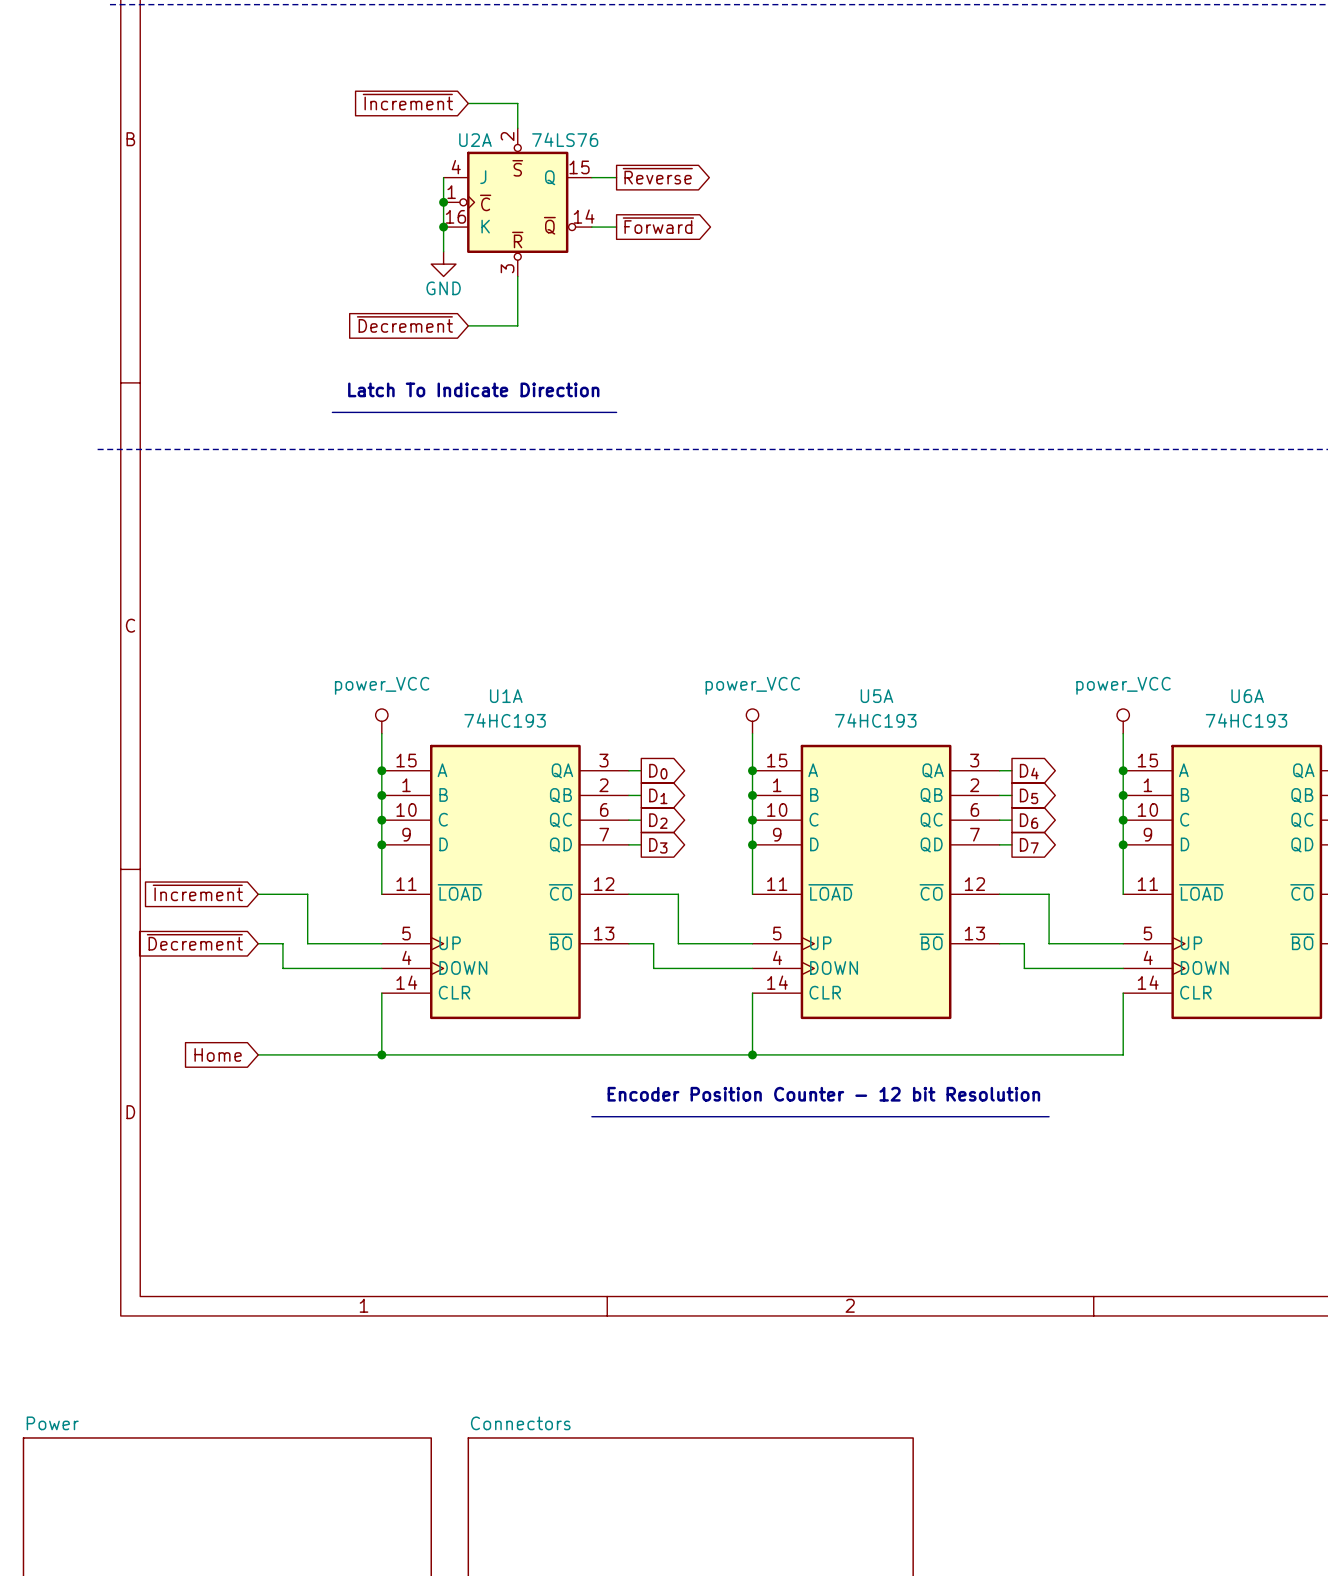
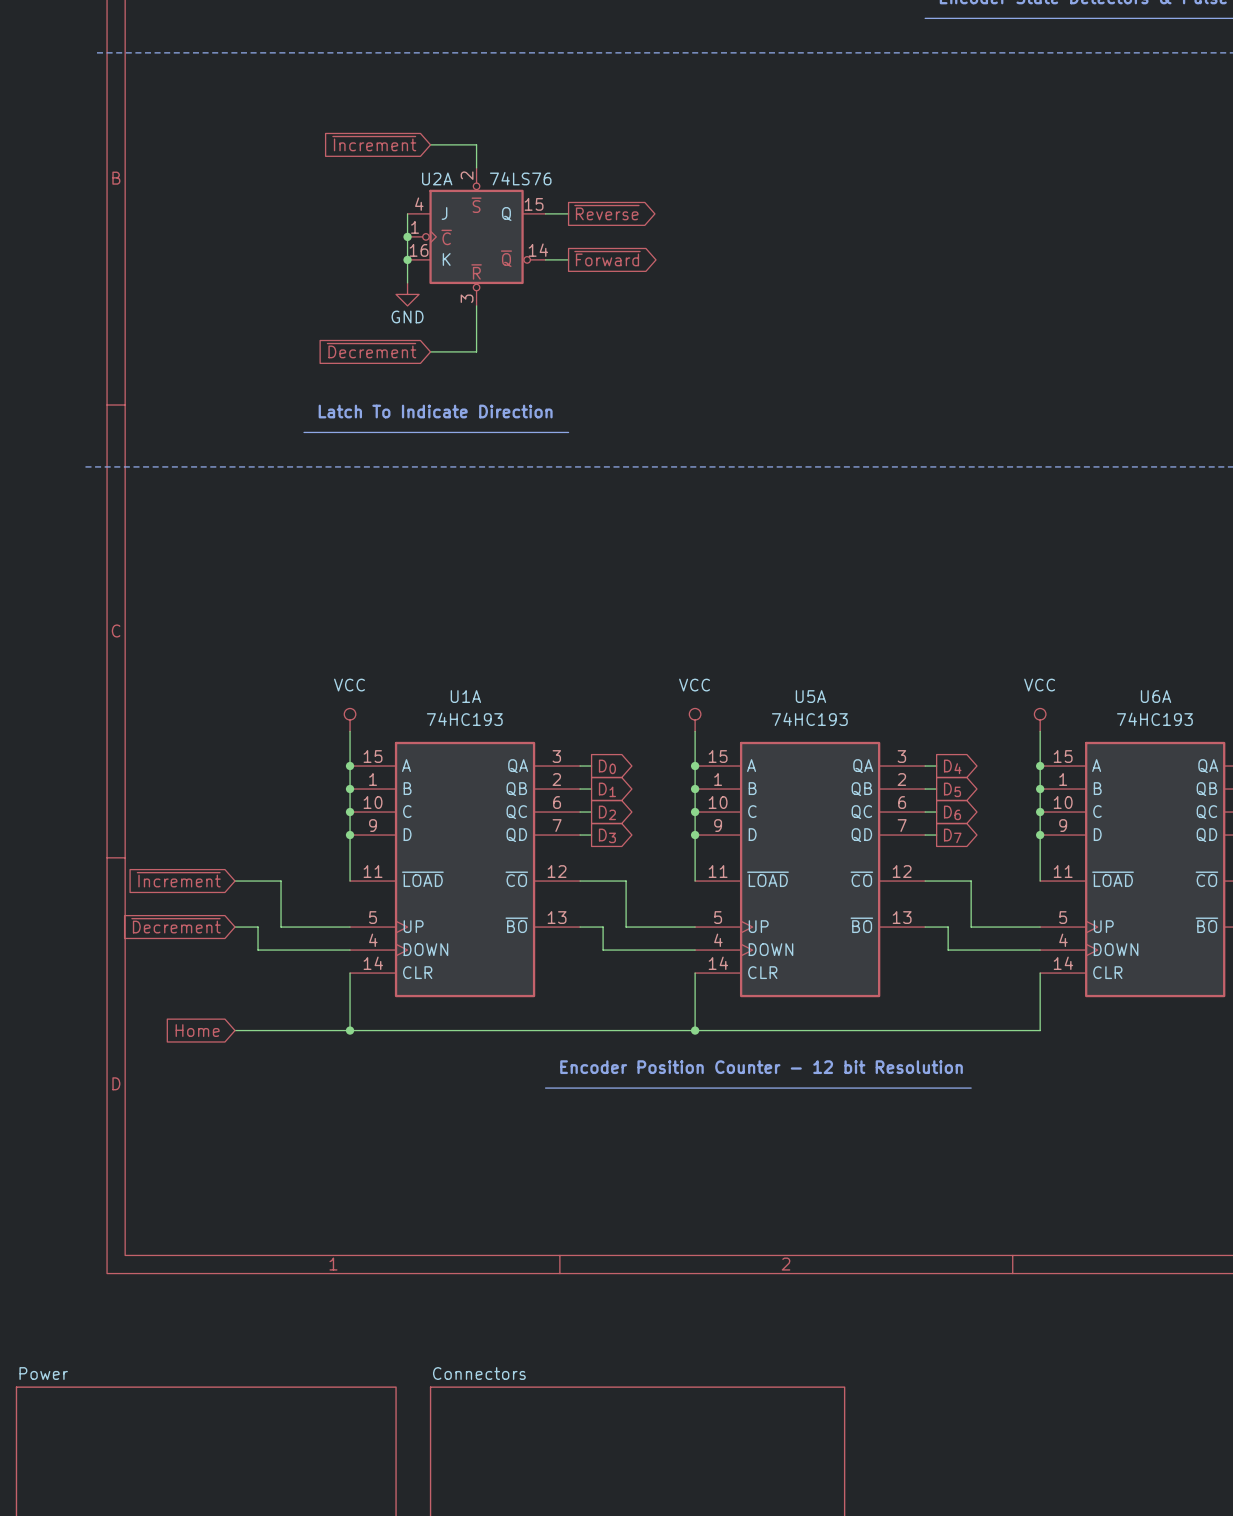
power symbol: power_VCC (381, 721) -> VCC (350, 720)
power symbol: power_VCC (752, 721) -> VCC (695, 720)
power symbol: power_VCC (1123, 721) -> VCC (1040, 720)

